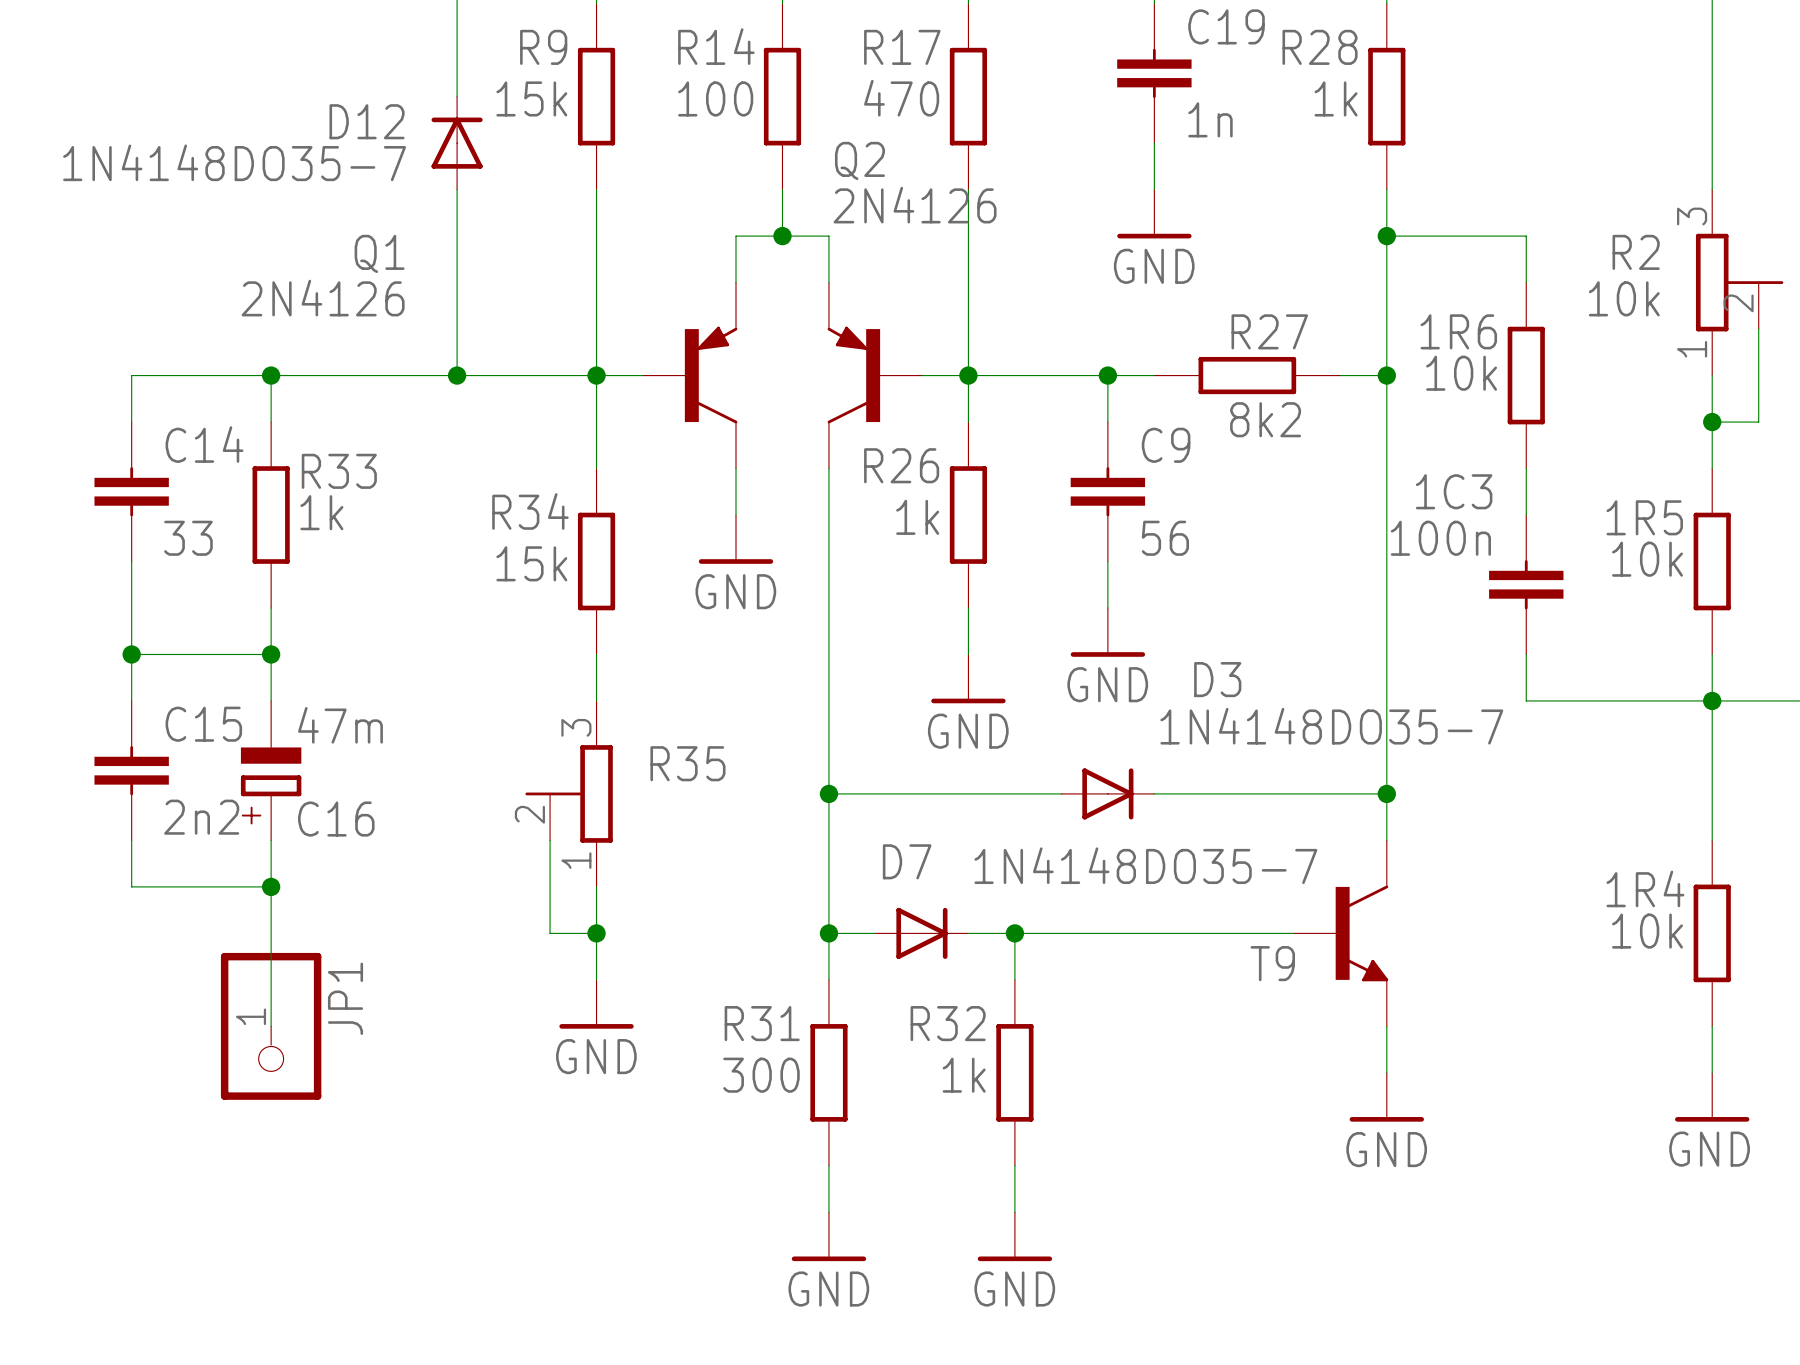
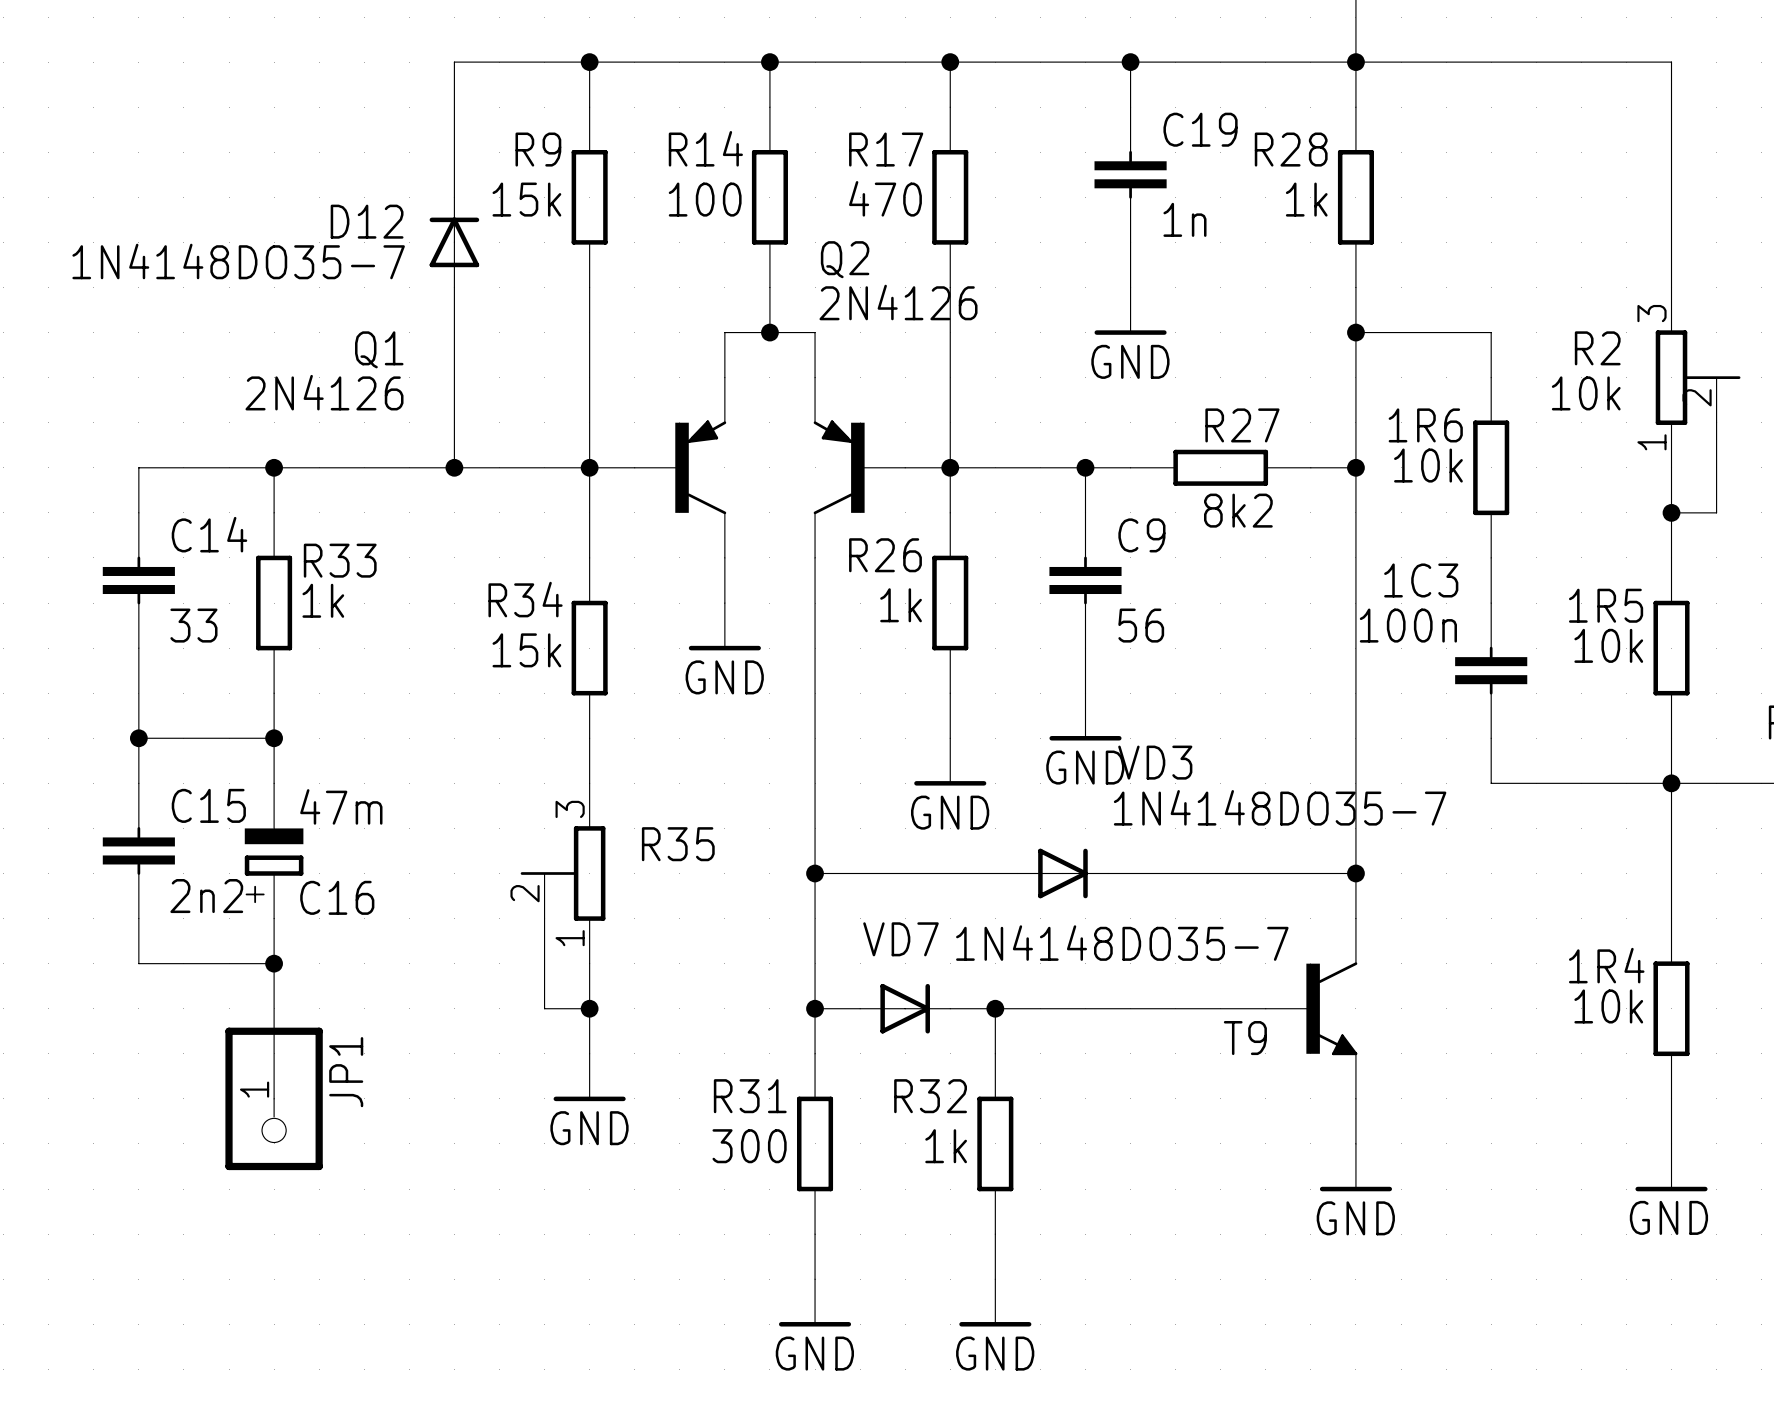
VD3: none -> 1N4148DO35-7 (1062, 873)
D3: 1N4148DO35-7 (1107, 793) -> none
D7 name: D7 (907, 861) -> VD7 (900, 939)

